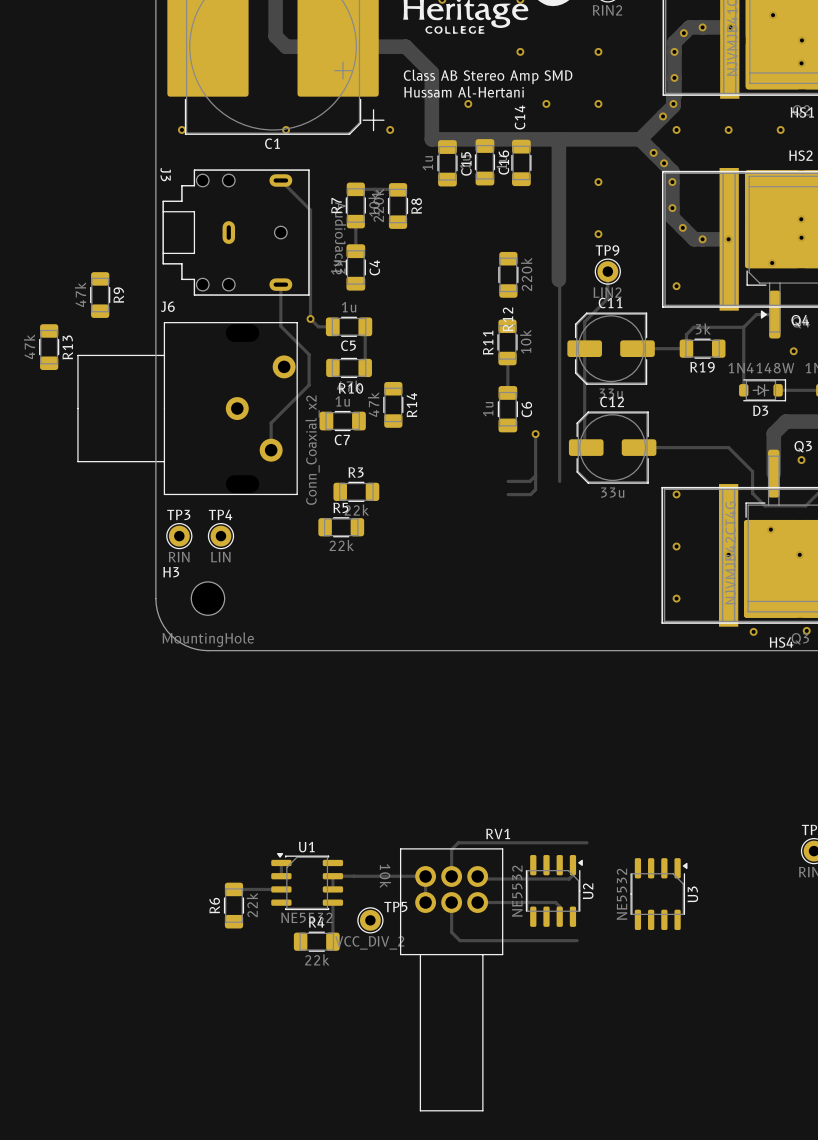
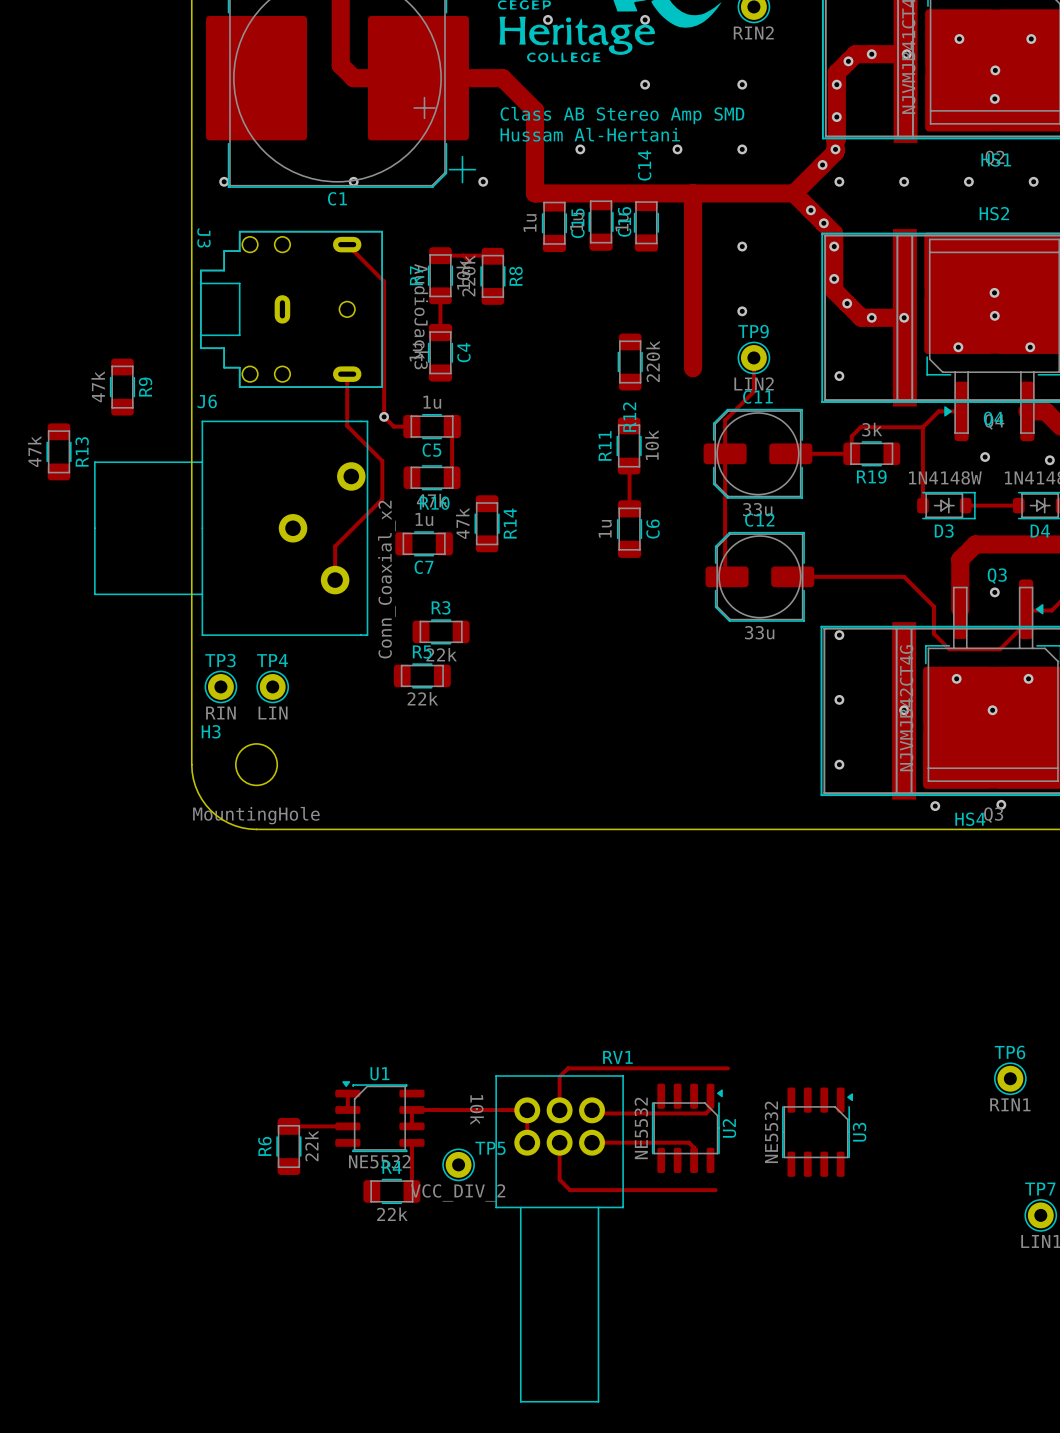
track: (559, 280) (559, 481) -> none
track: (535, 434) (535, 489) (530, 494) (508, 494) -> none
via: (535, 434) -> none
track: (535, 475) (529, 481) (508, 481) -> none

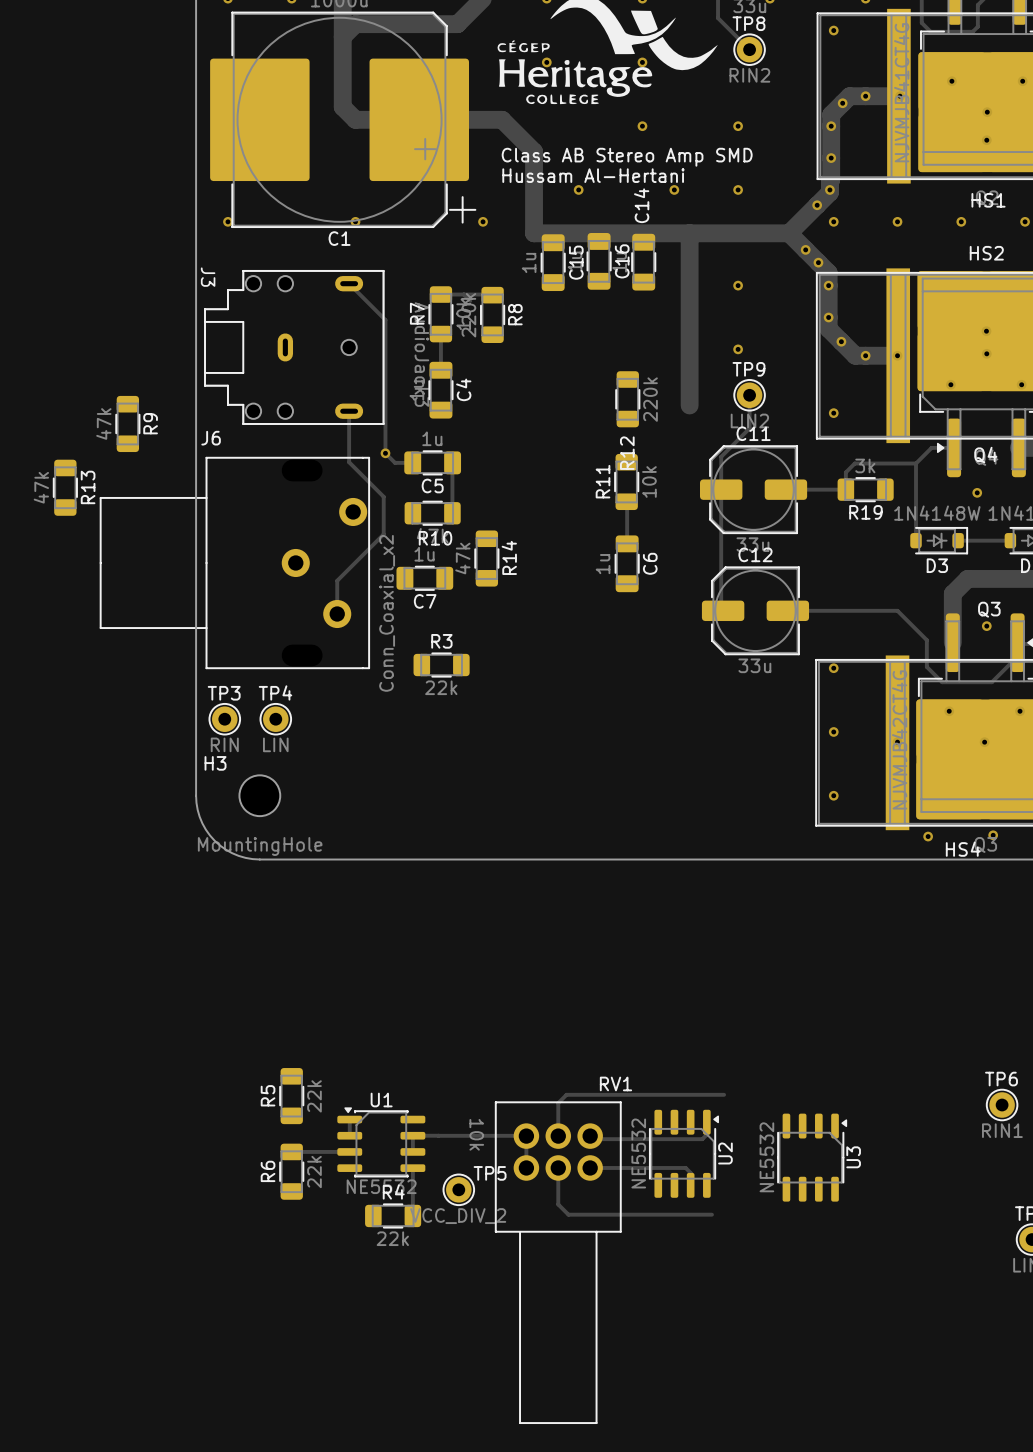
R5 name position: R5 (422, 652) -> R5 (268, 1095)
R5 rotation: 0° (422, 675) -> 90° clockwise (291, 1096)
R5 position: (422, 675) -> (291, 1096)
R5 value position: 22k (422, 698) -> 22k (314, 1096)

